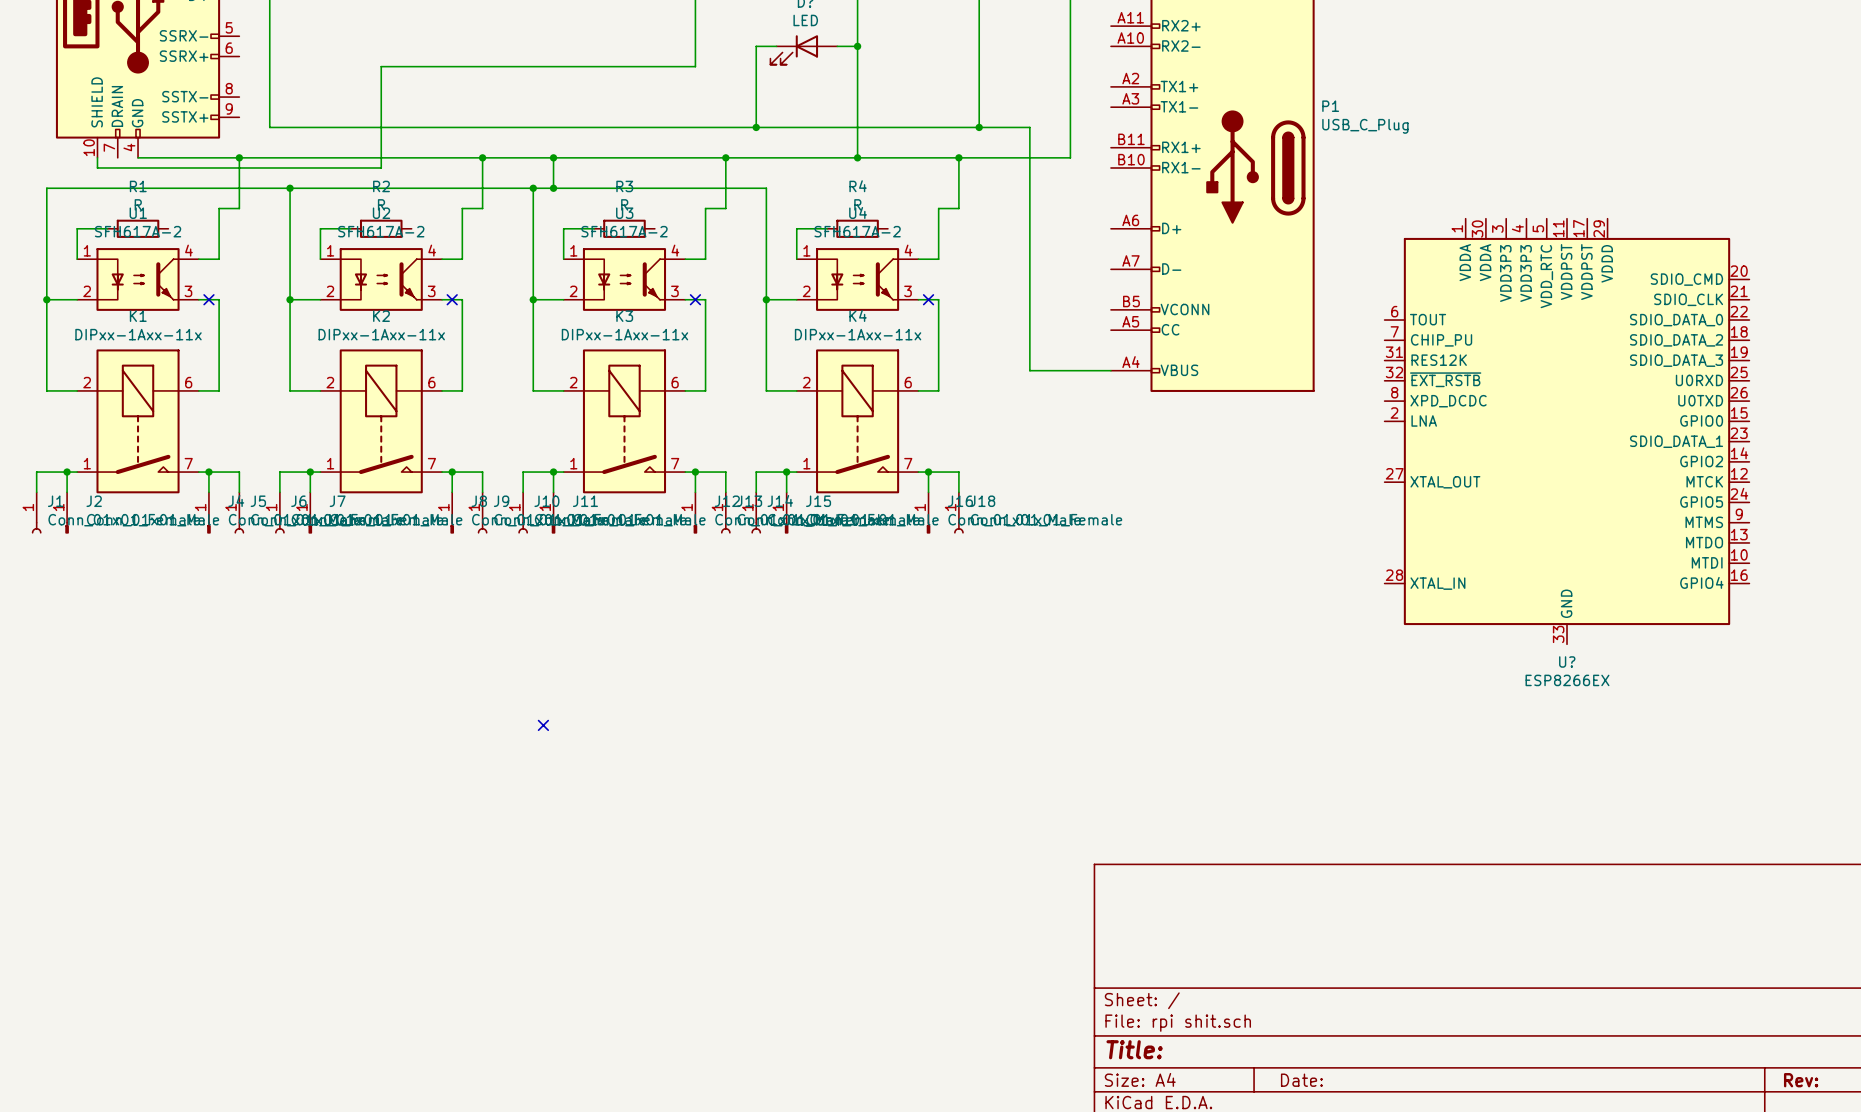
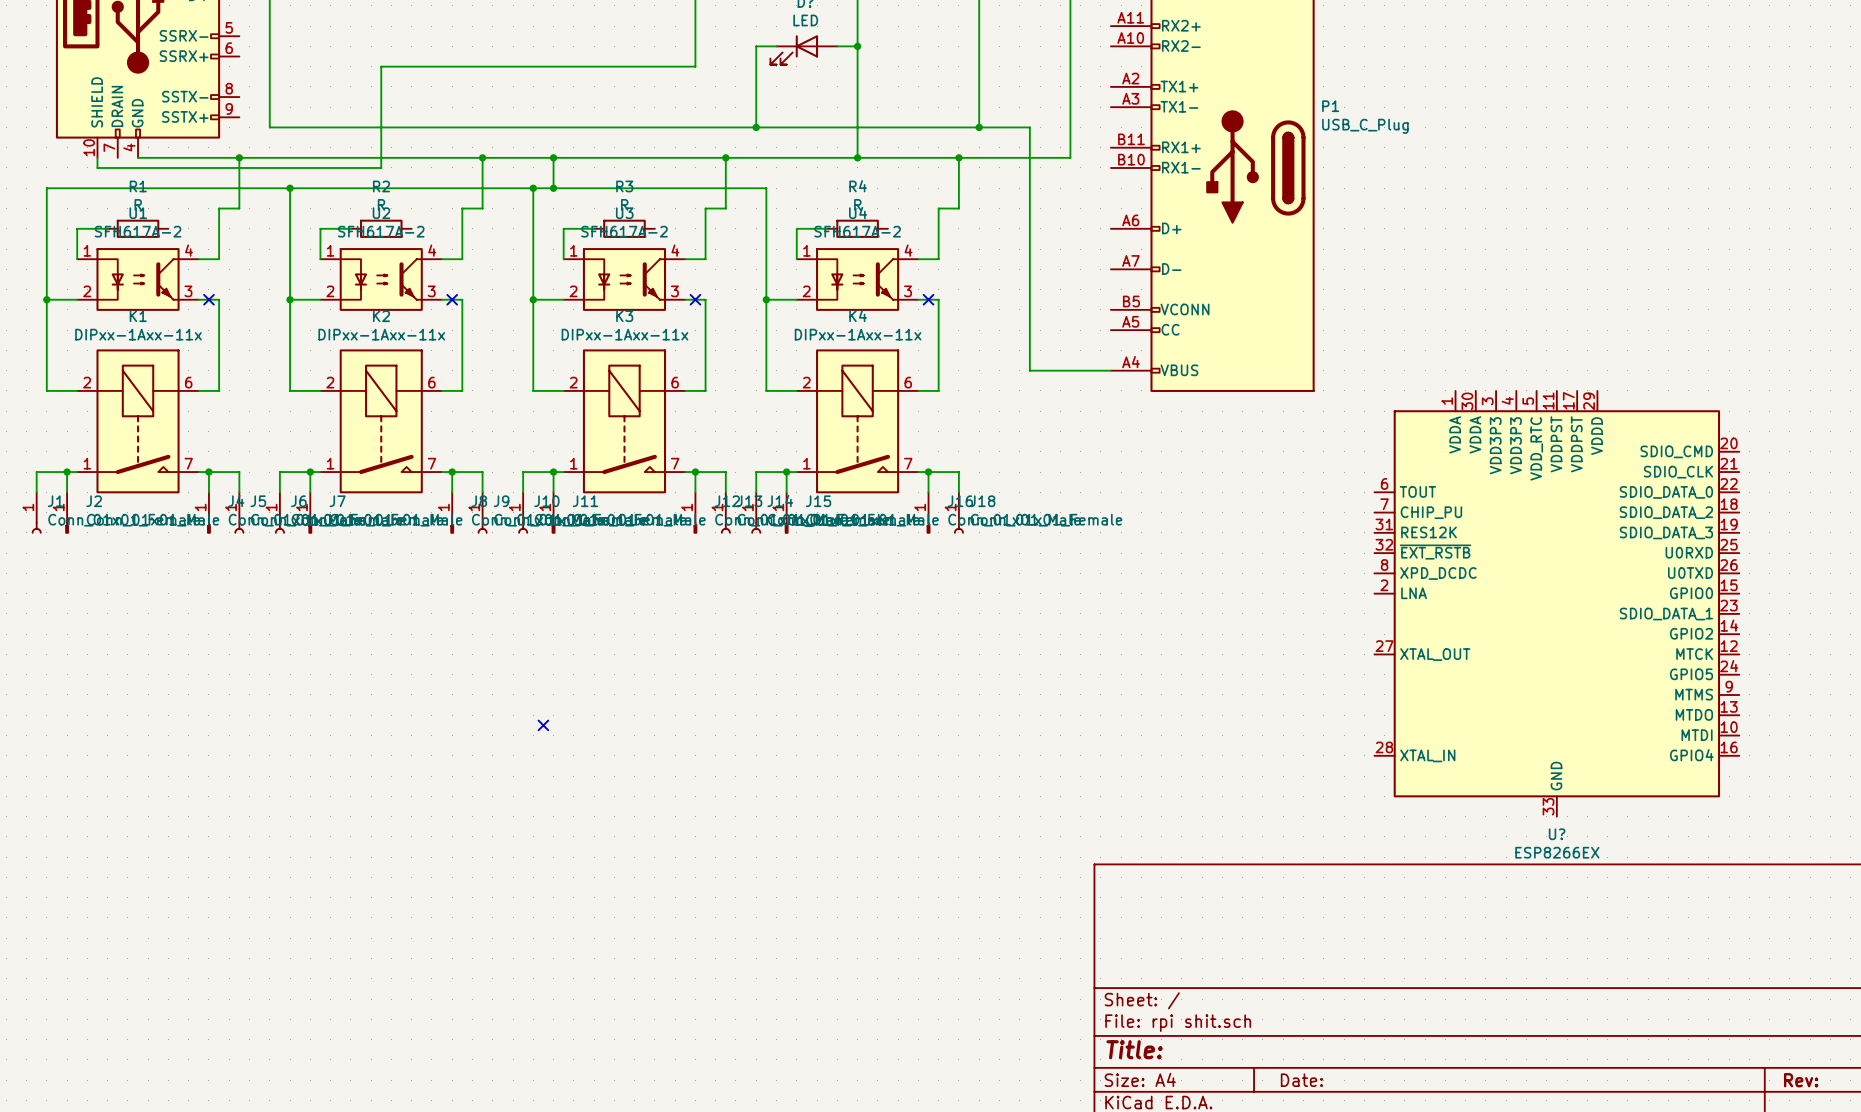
U? position: (1567, 431) -> (1556, 603)

